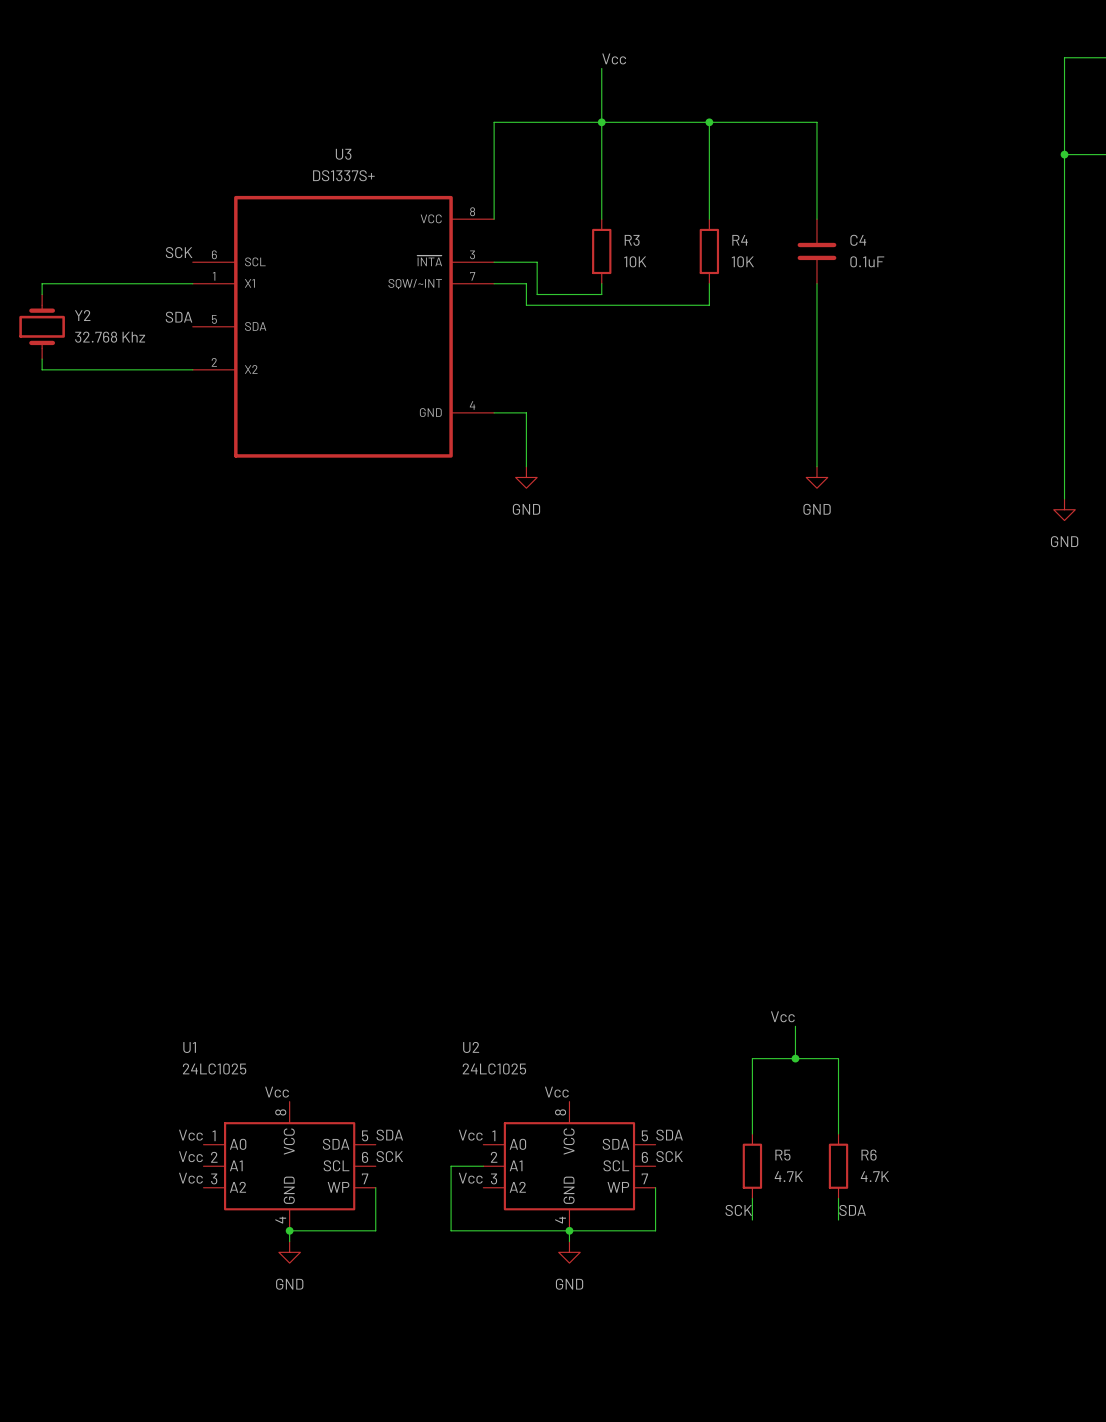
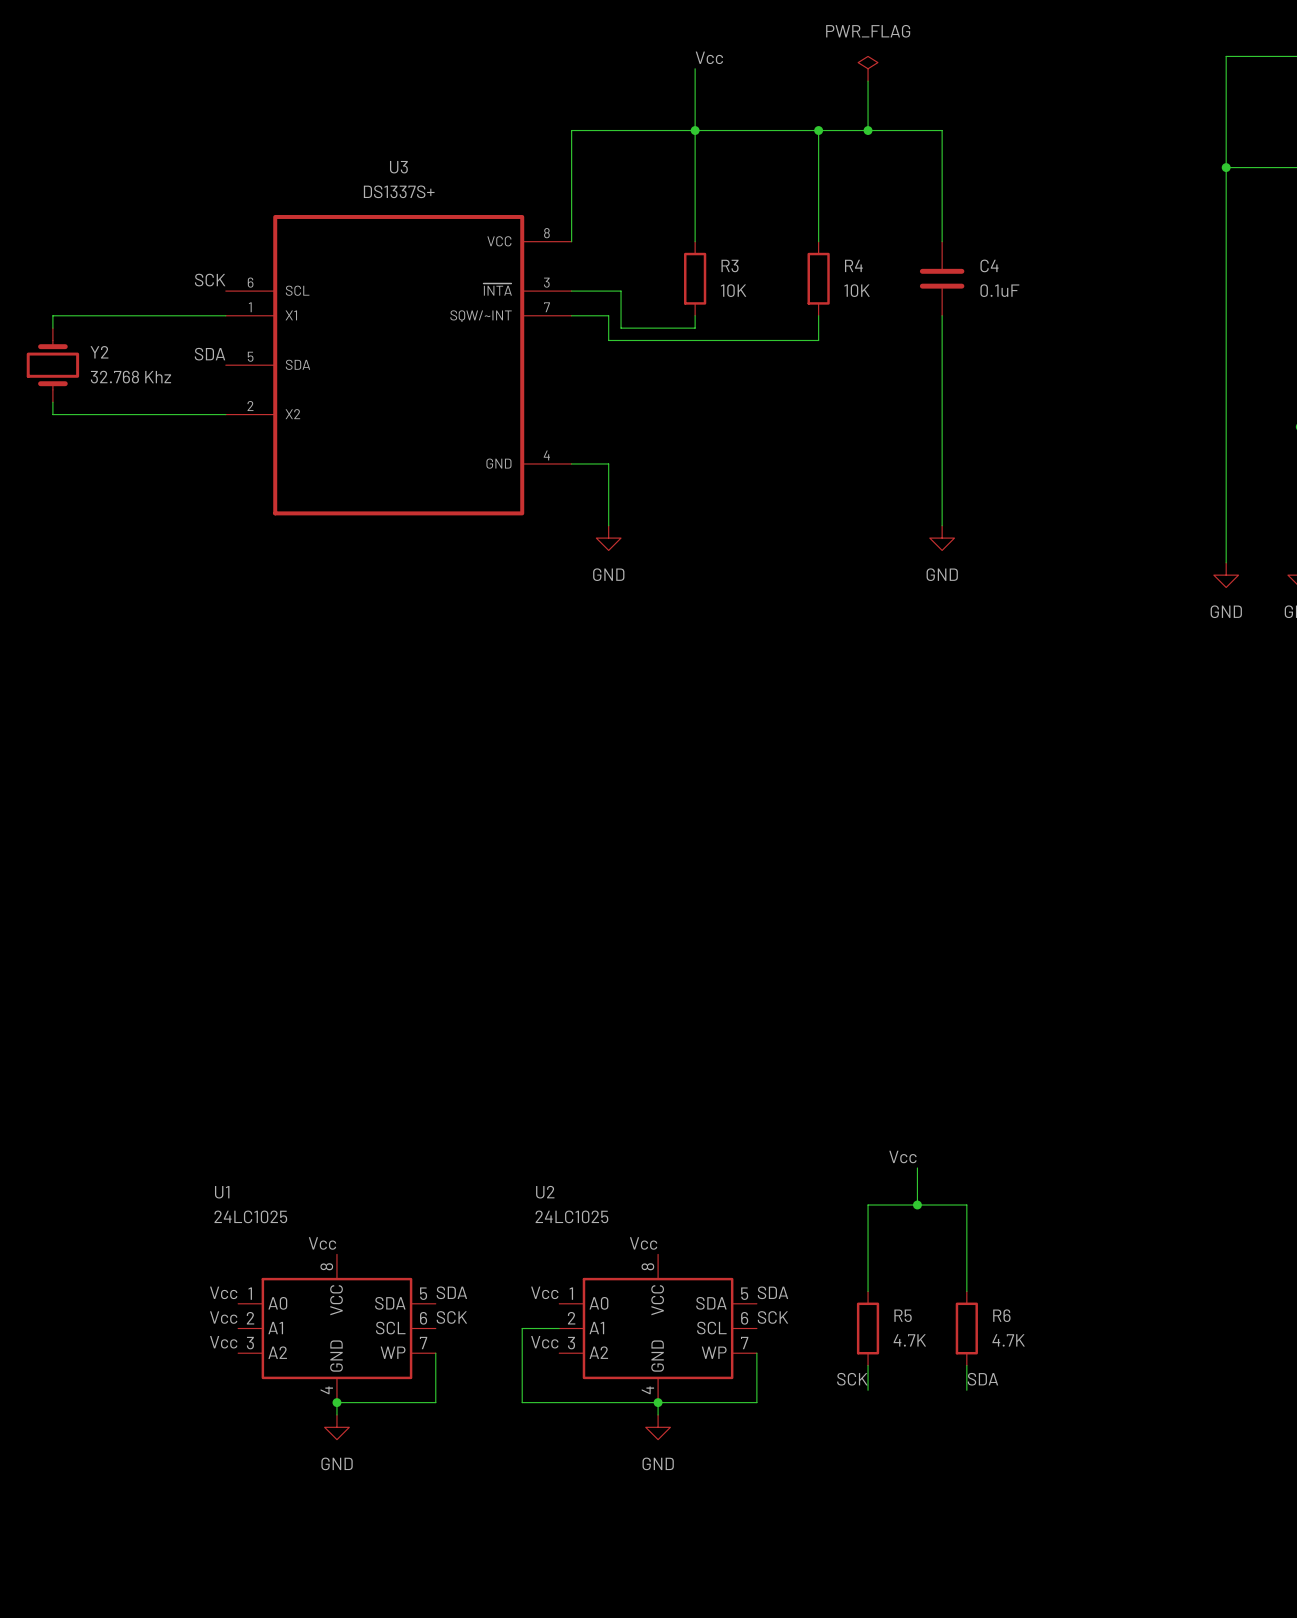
power symbol: none -> PWR_FLAG (868, 68)
wire: none -> (868, 81) (868, 130)
junction: none -> (868, 130)

